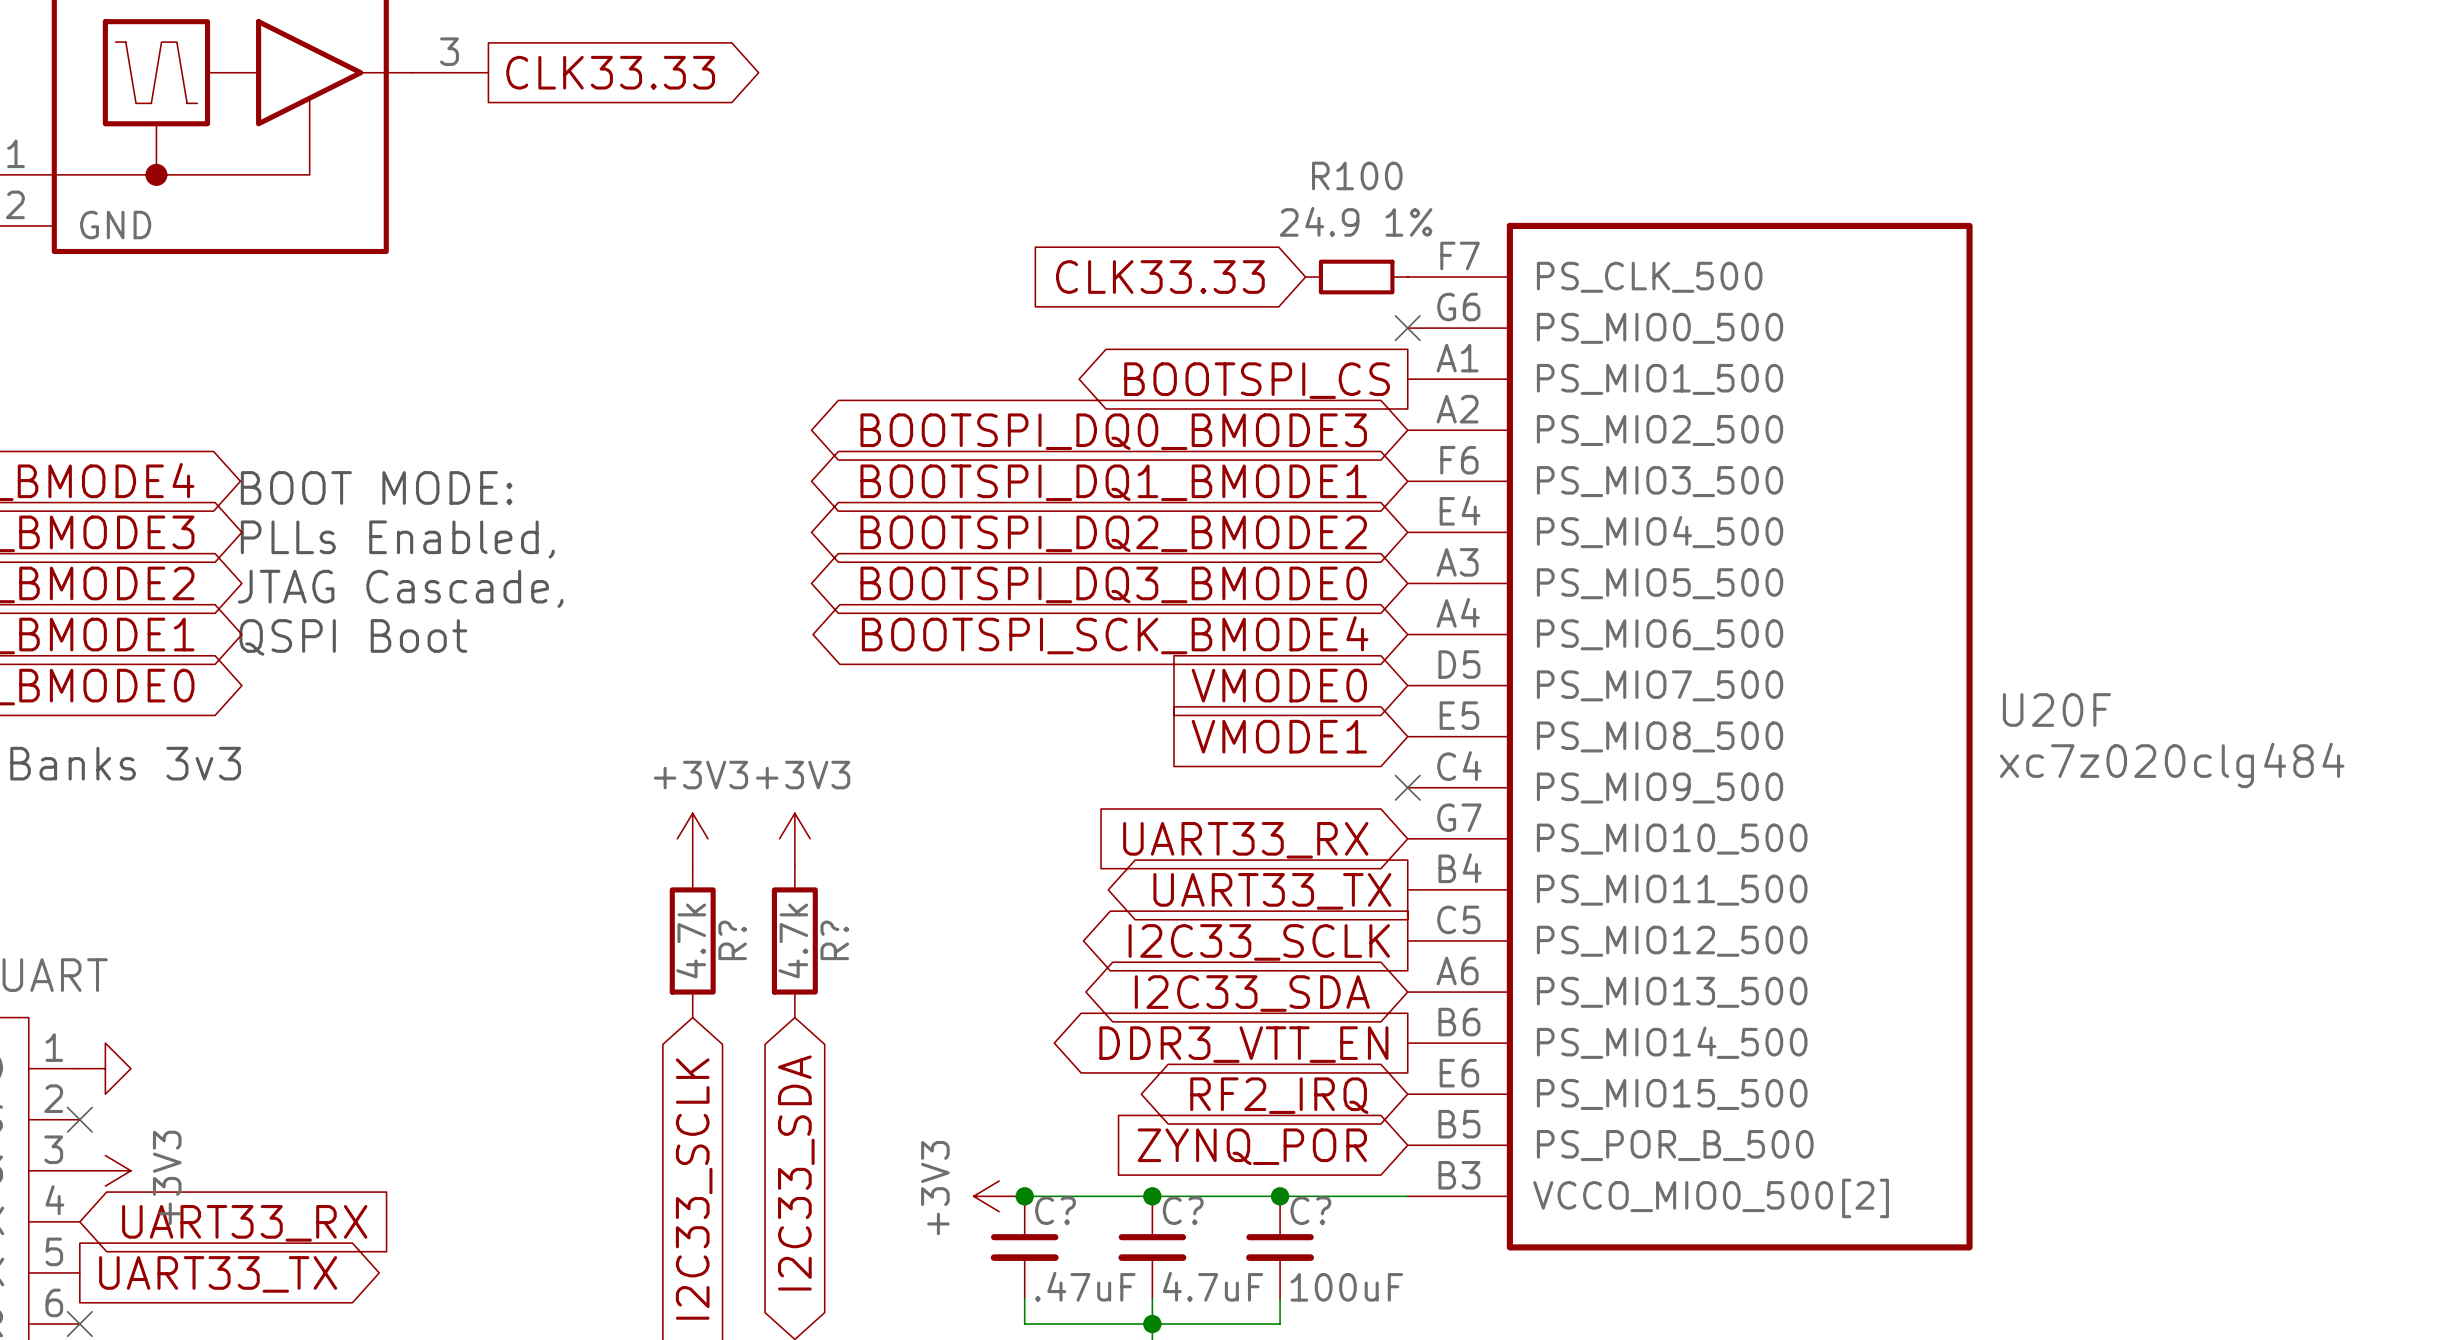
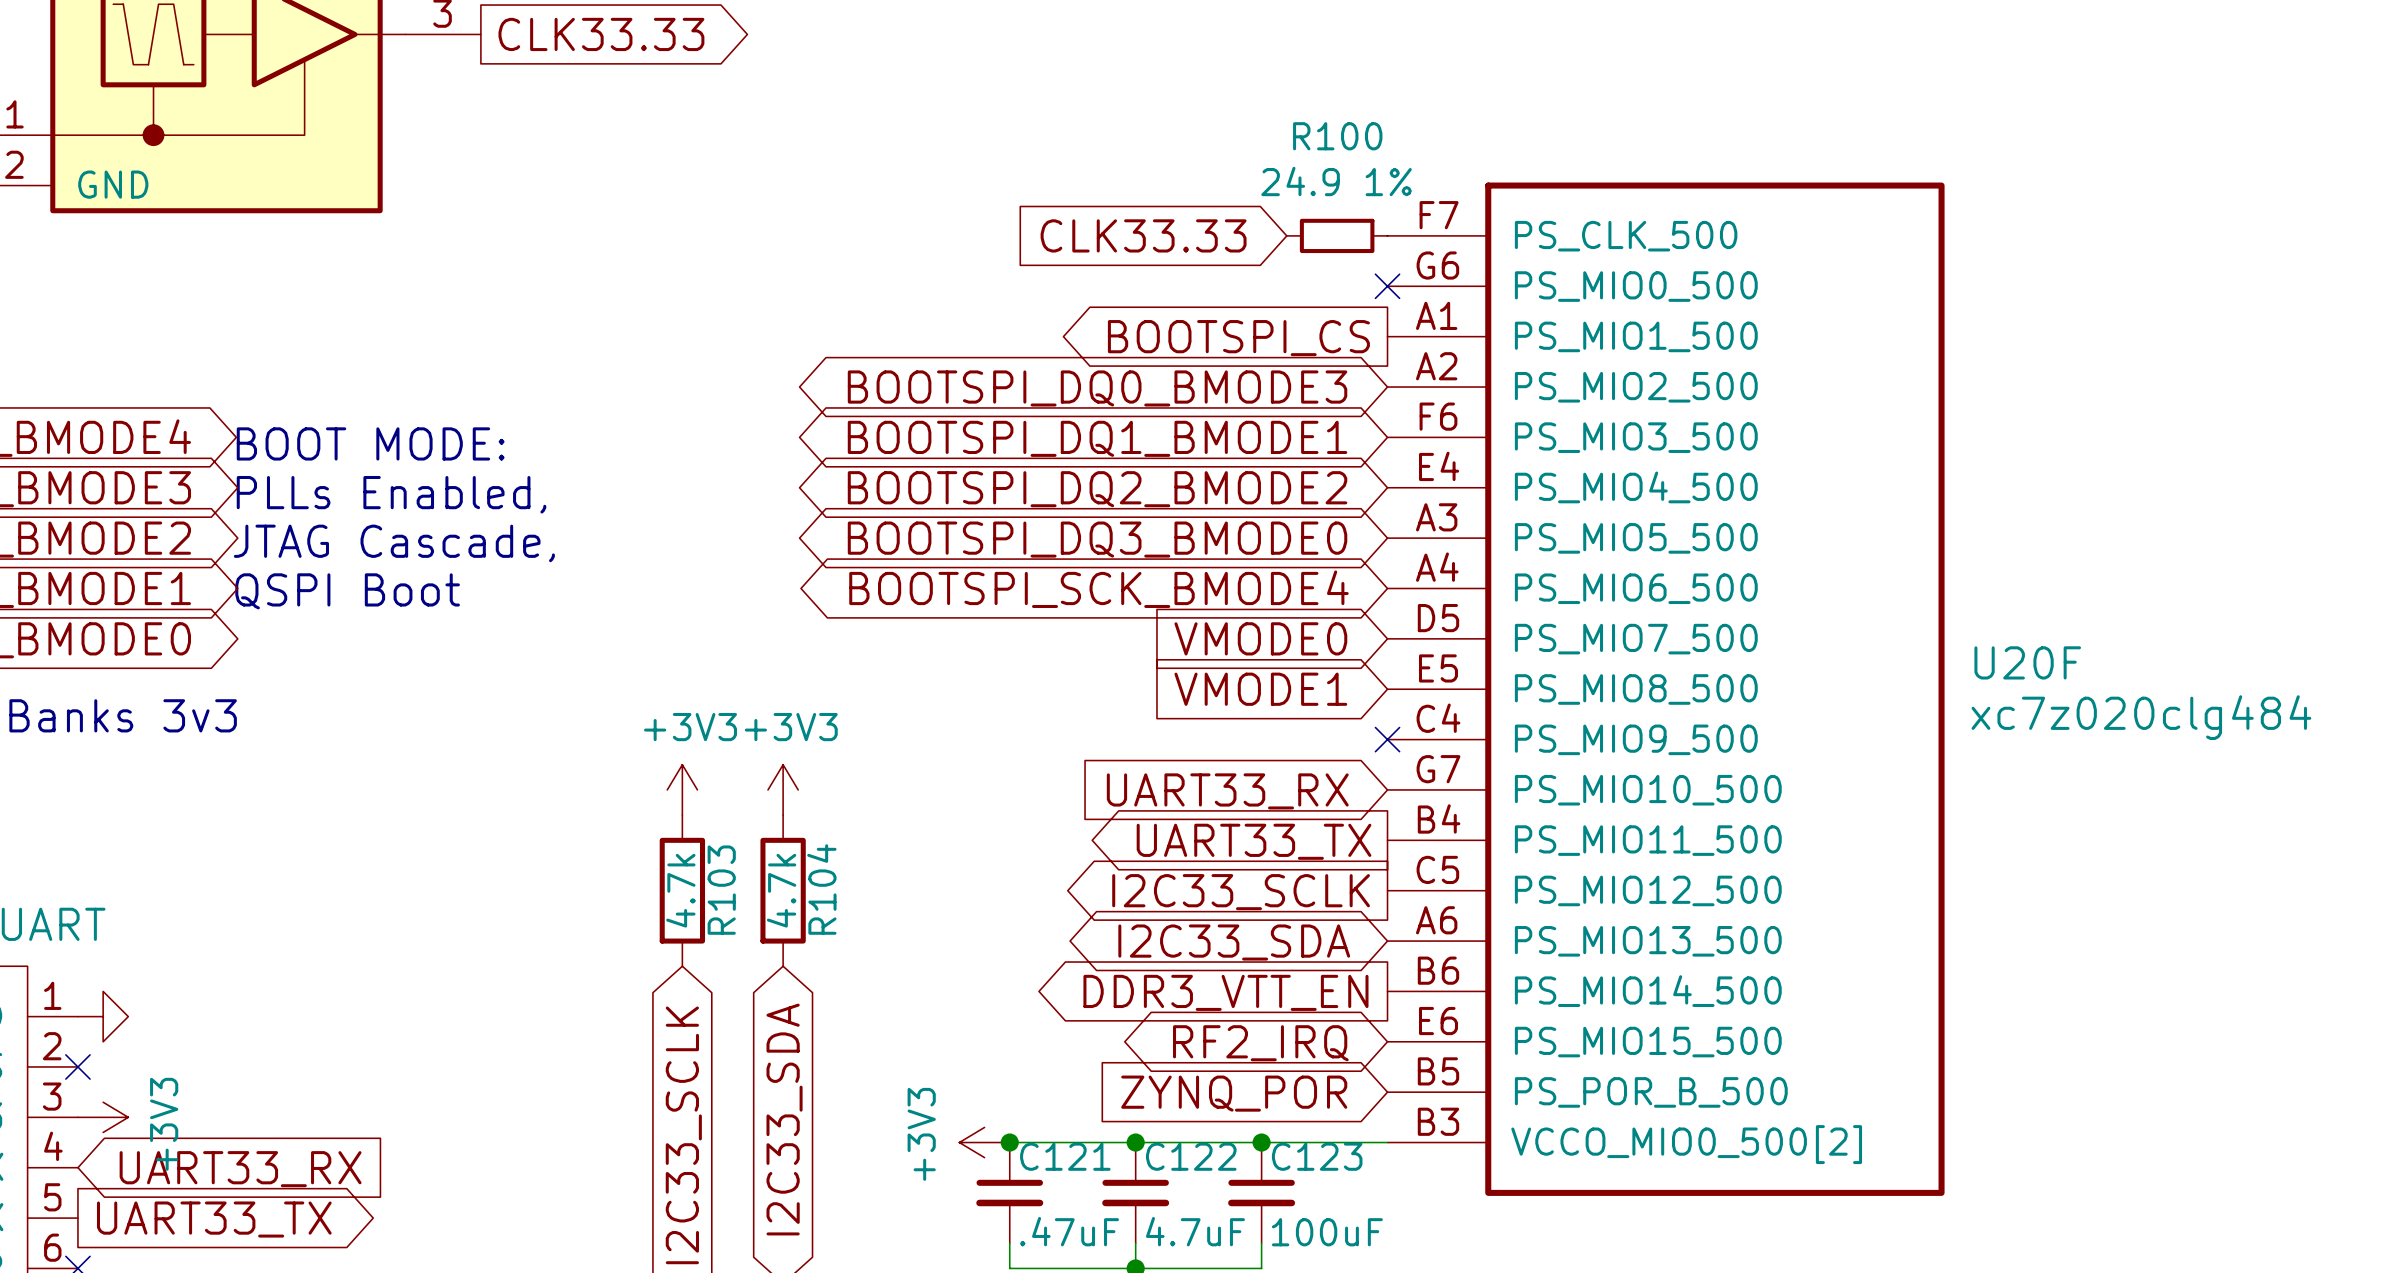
R? name: R? (732, 940) -> R103 (721, 890)
R? name: R? (834, 940) -> R104 (821, 889)
C? name: C? (1055, 1210) -> C121 (1065, 1156)
C? name: C? (1183, 1210) -> C122 (1191, 1156)
C? name: C? (1310, 1210) -> C123 (1317, 1156)

